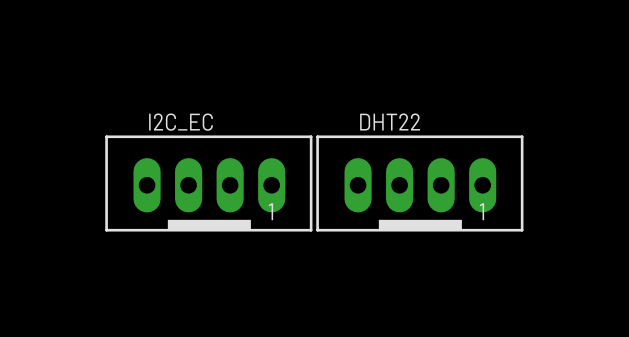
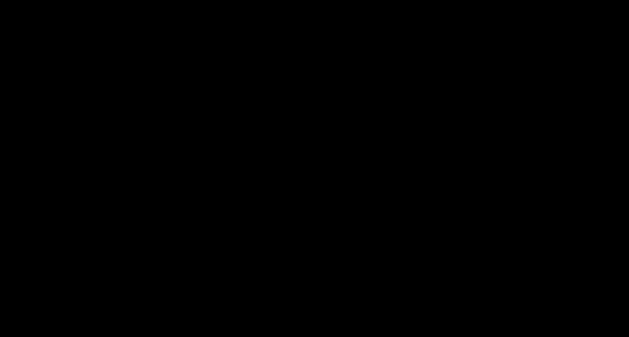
I2C_EC: (208, 183) -> none
DHT22: (419, 183) -> none

